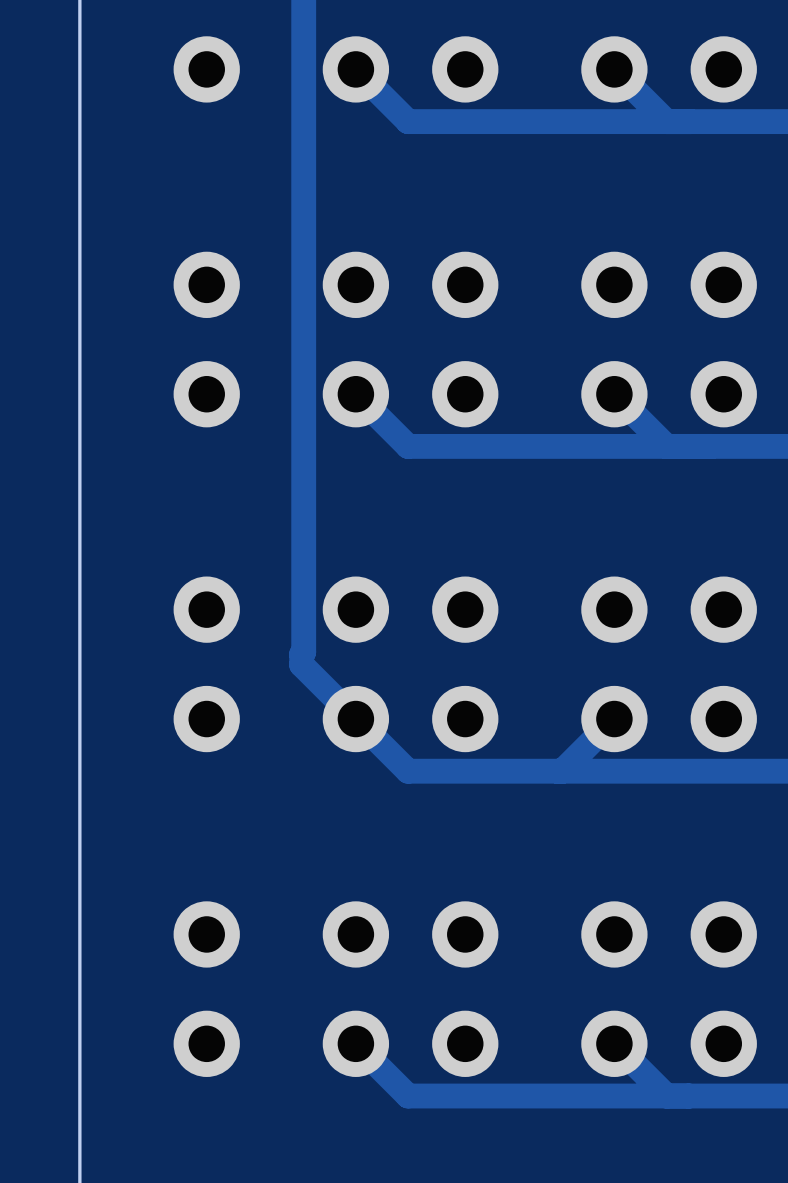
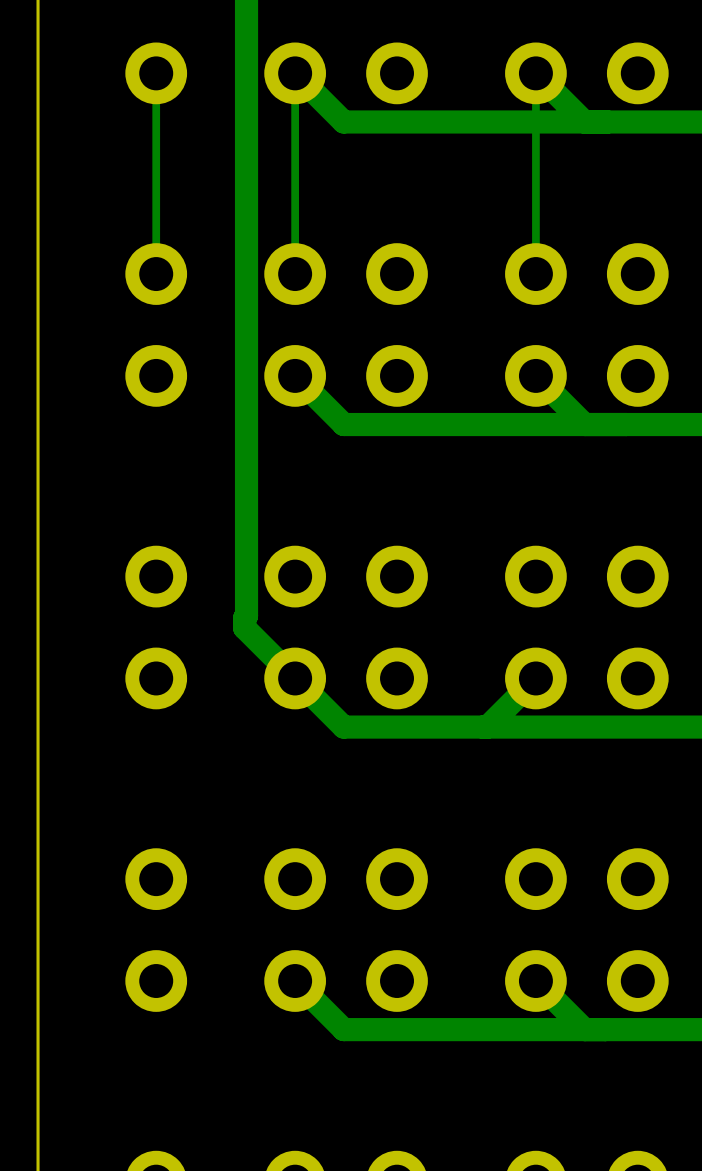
track: none -> (156, 73) (156, 274)
track: none -> (295, 73) (295, 274)
track: none -> (535, 73) (535, 274)

